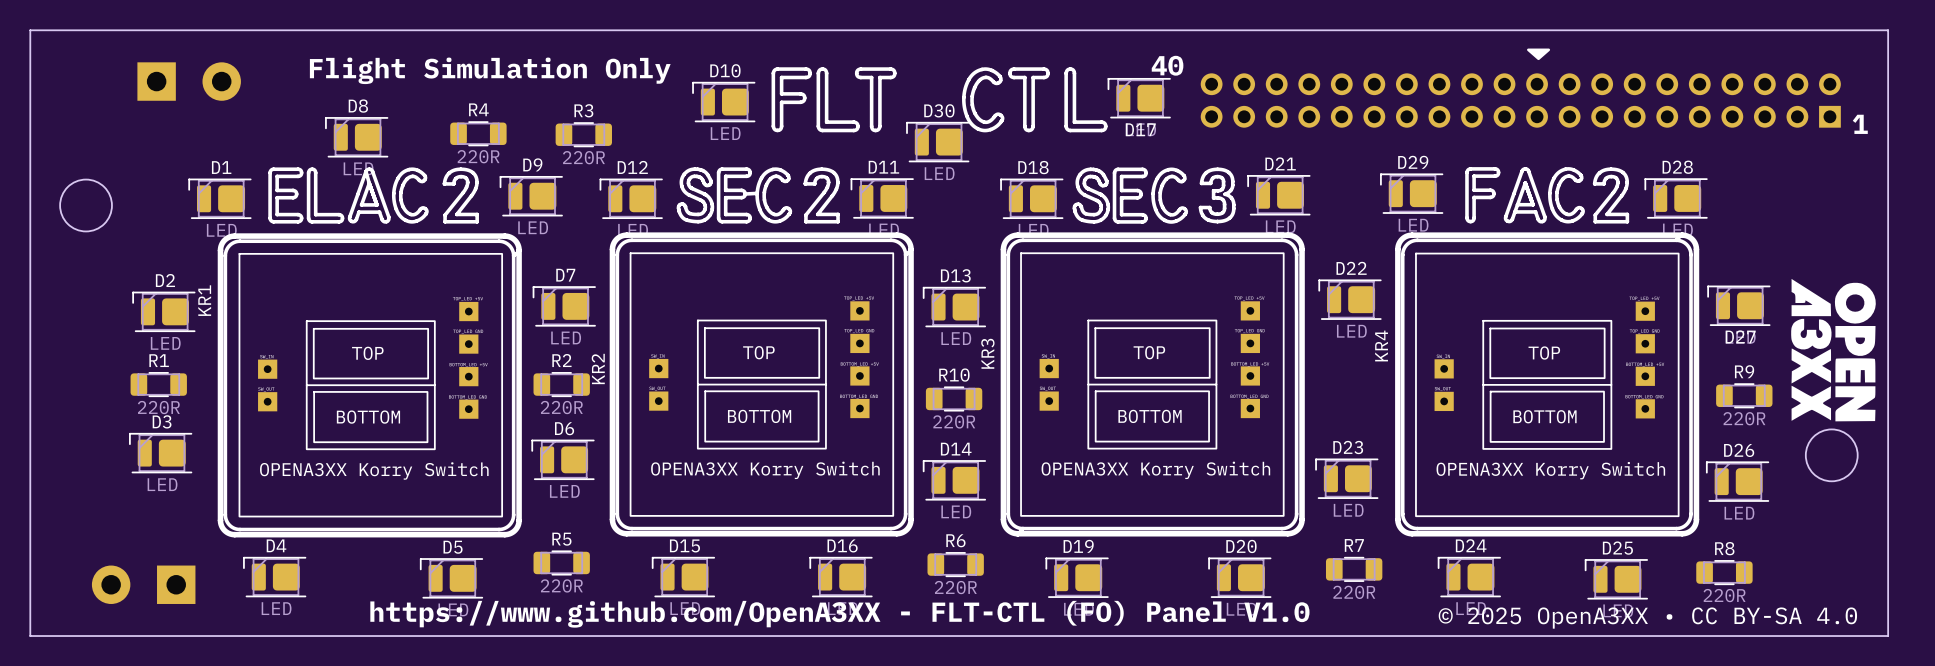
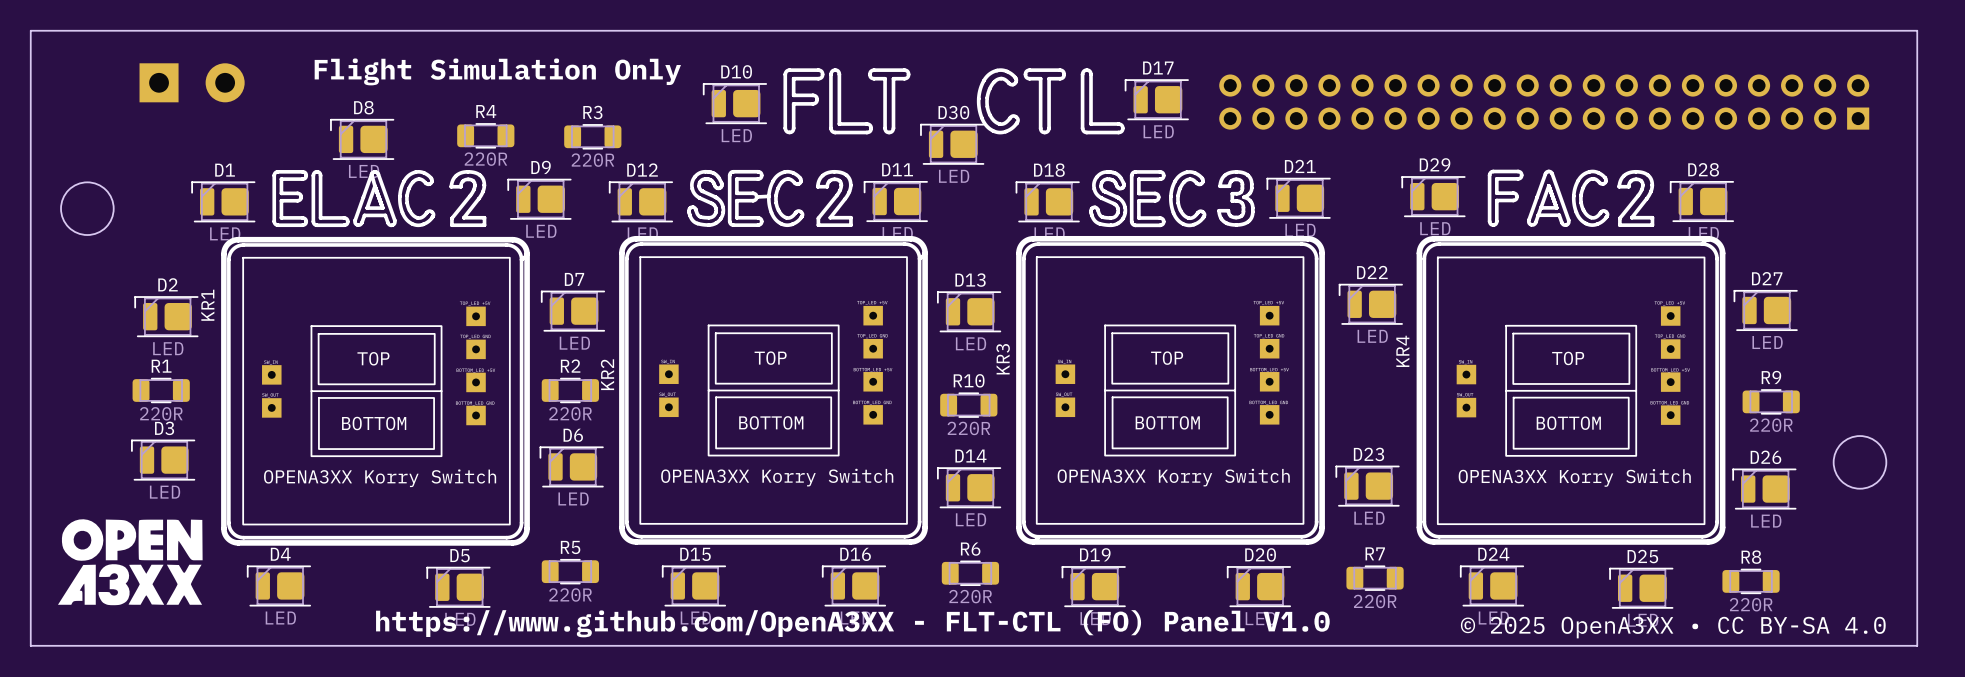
drawing: [1527, 48, 1551, 61] -> none
text: 40 (1167, 65) -> none
text: 1 (1860, 124) -> none
D17 name position: D17 (1140, 129) -> D17 (1158, 68)
drawing: [1791, 278, 1876, 422] -> none
D27 name position: D27 (1740, 336) -> D27 (1767, 278)
drawing: none -> [57, 519, 203, 606]
part: (143, 584) -> none

